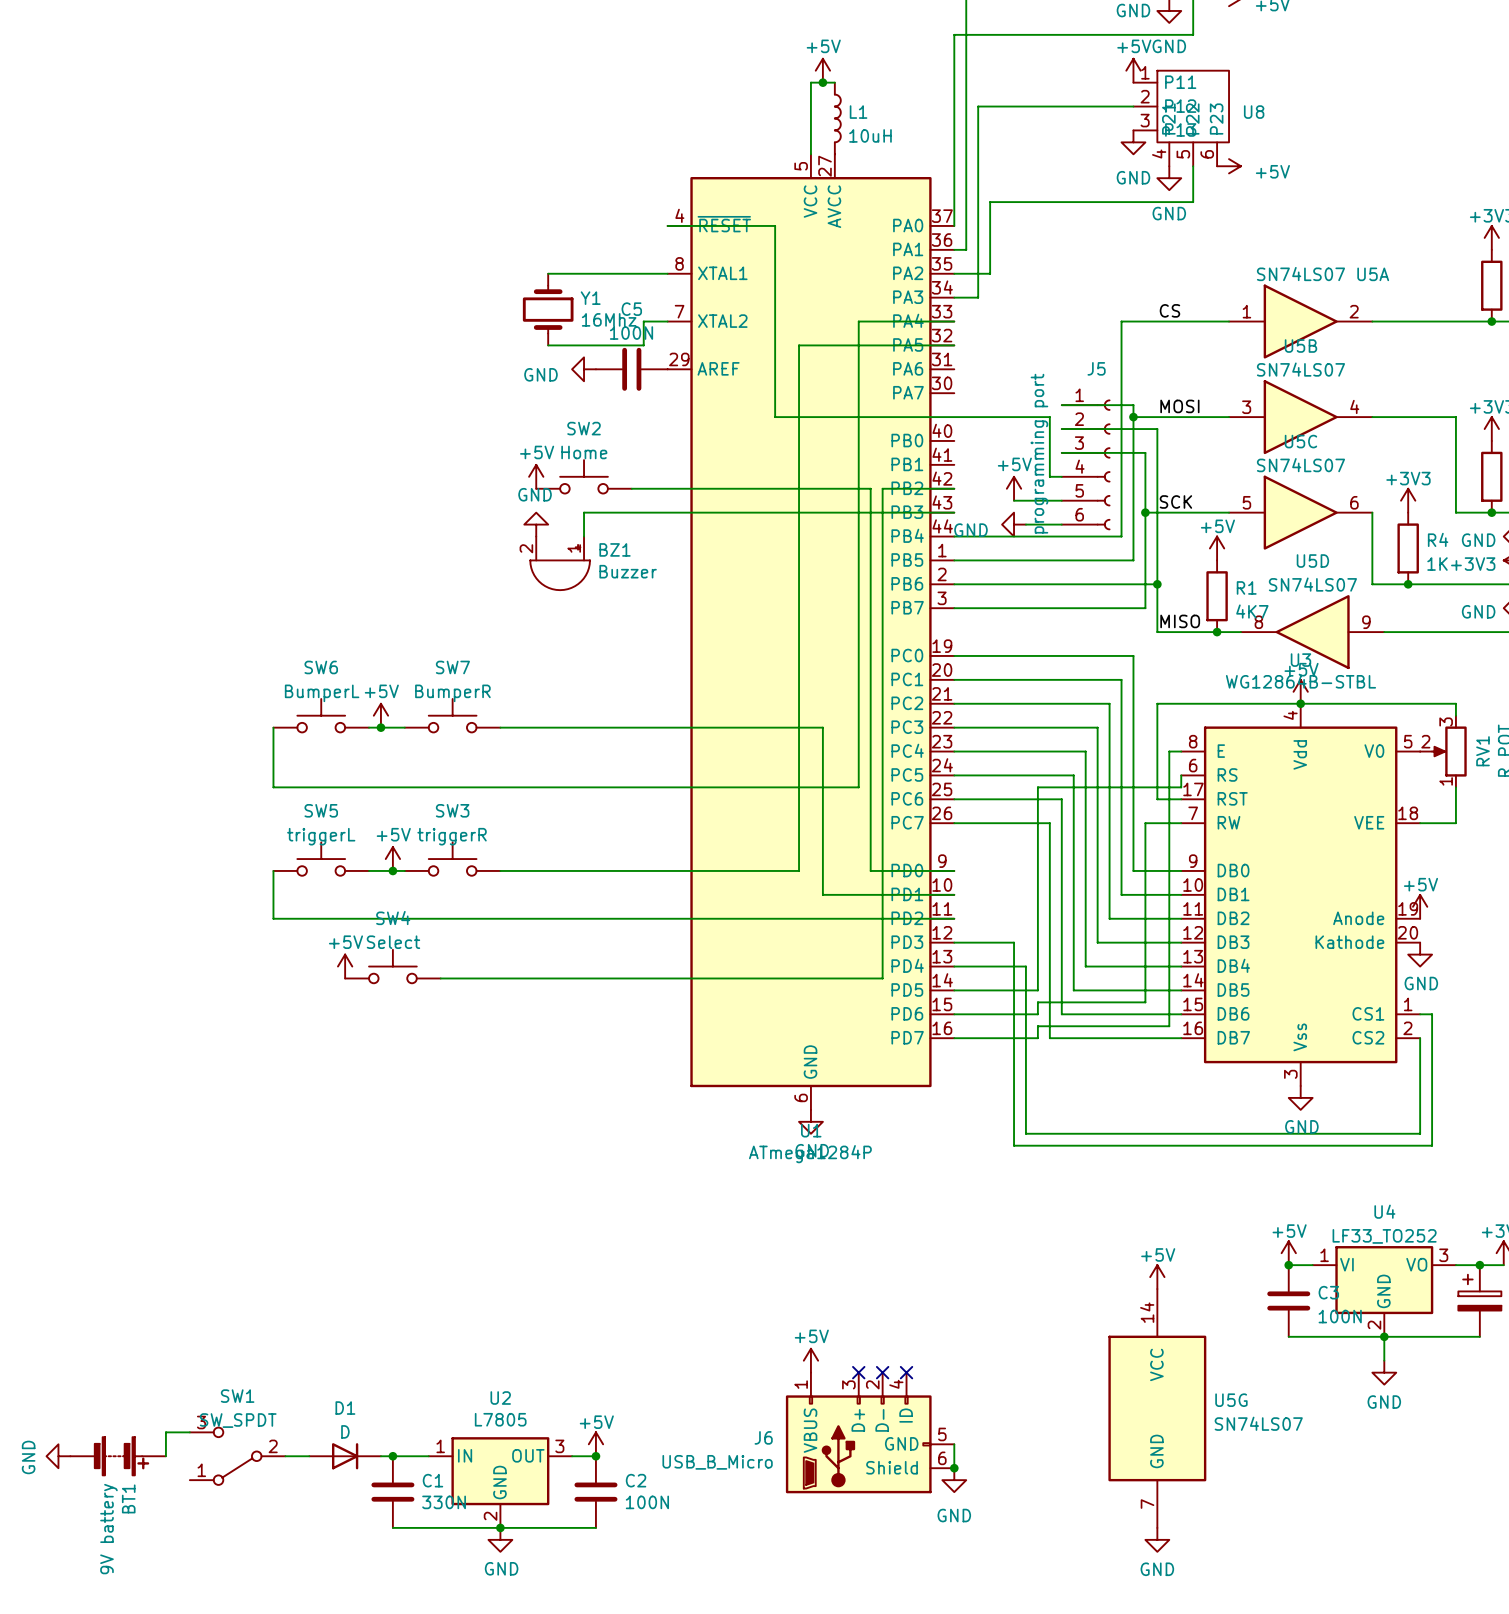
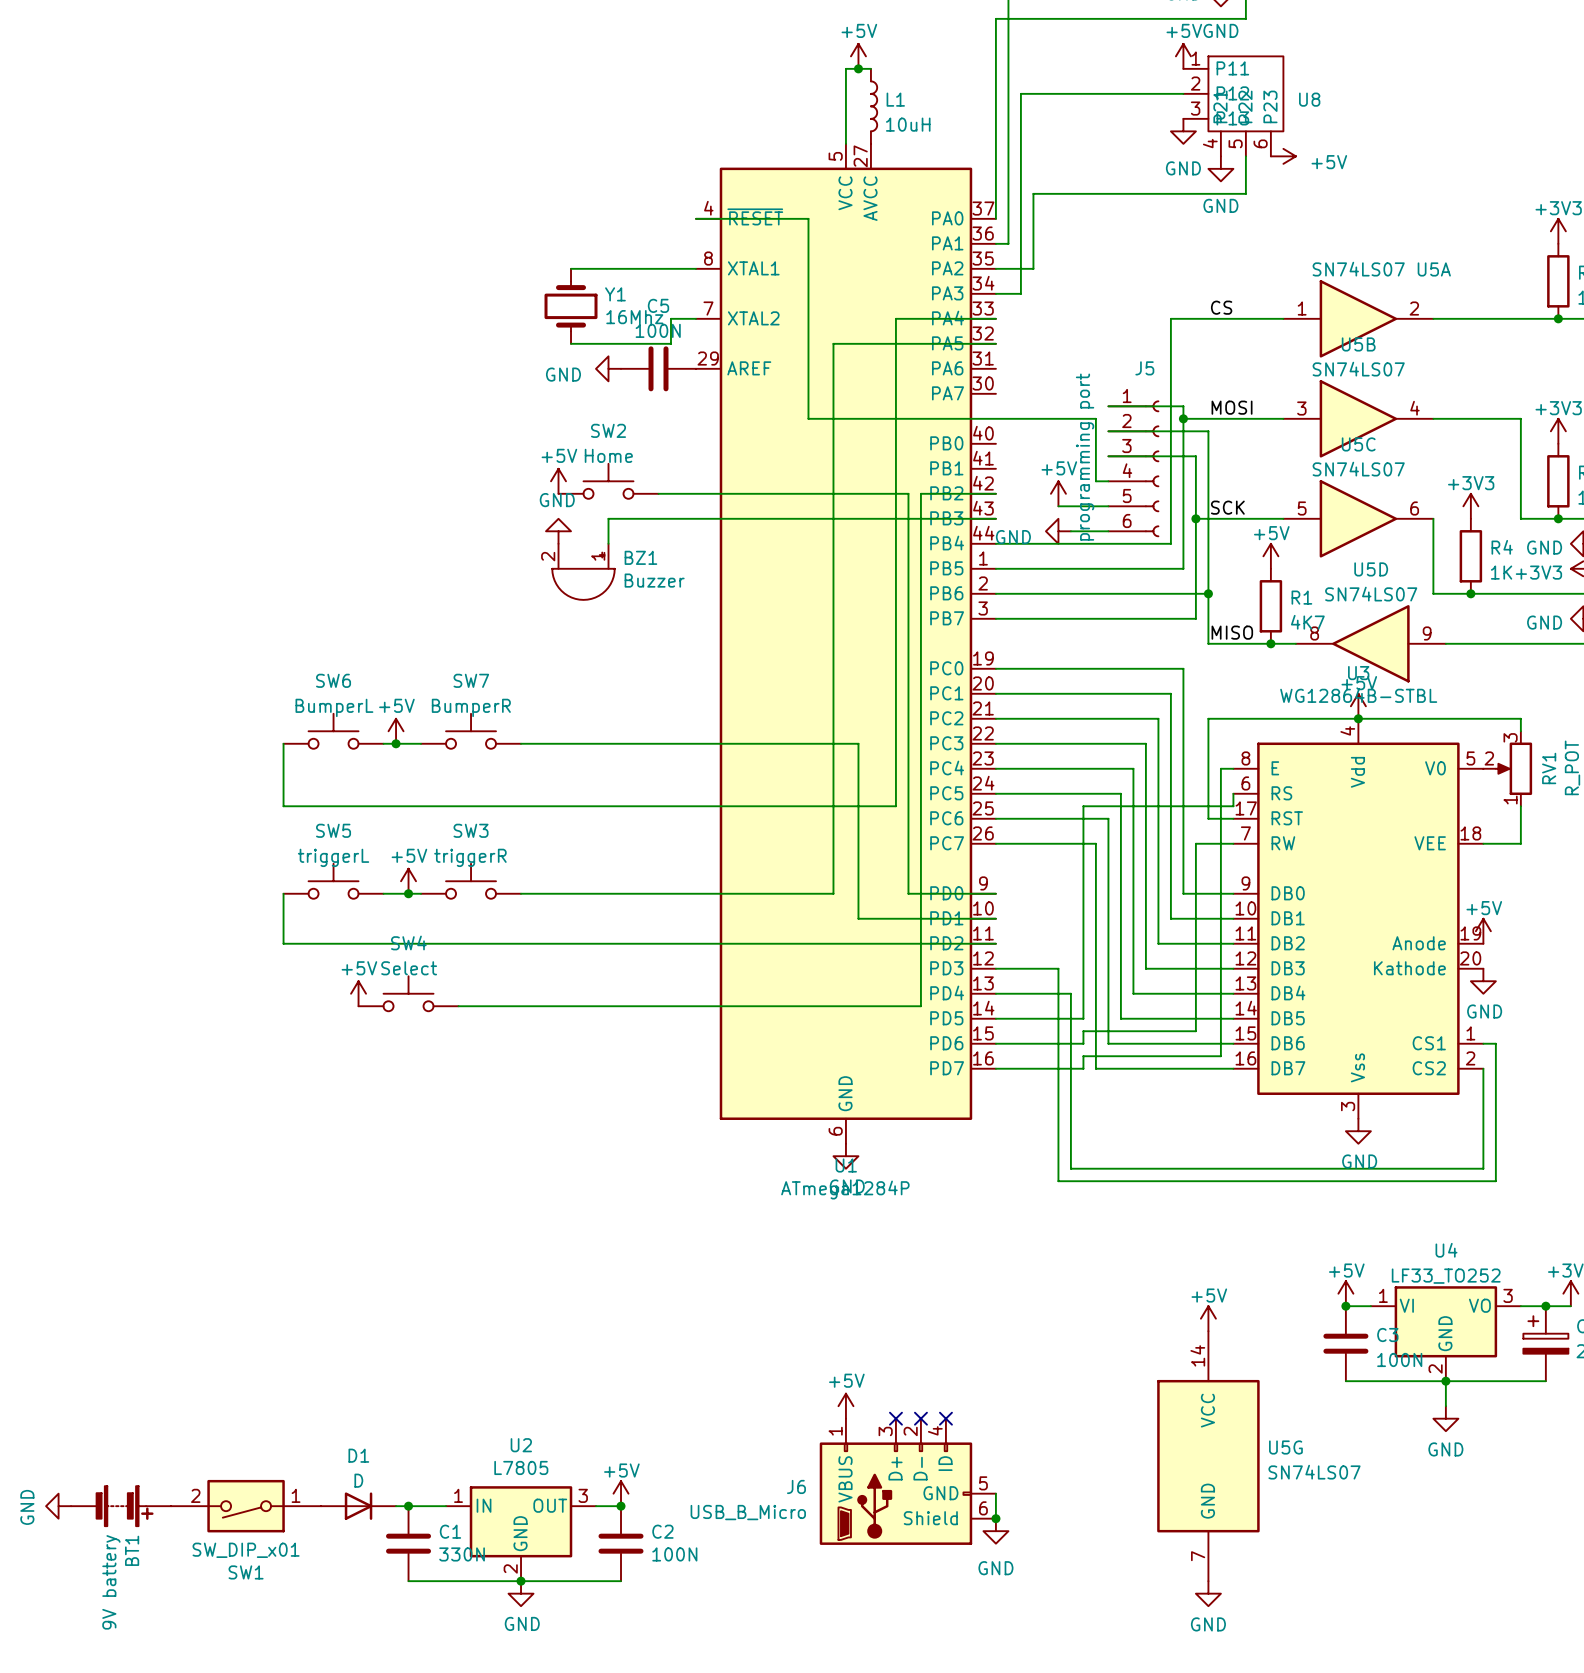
SW1 name position: SW1 (237, 1396) -> SW1 (246, 1572)
SW1 value: SW_SPDT (238, 1420) -> SW_DIP_x01 (246, 1550)
SW1 symbol: [189, 1427, 286, 1485] -> [171, 1479, 322, 1533]
wire: (189, 1432) (165, 1432) (165, 1456) -> none

